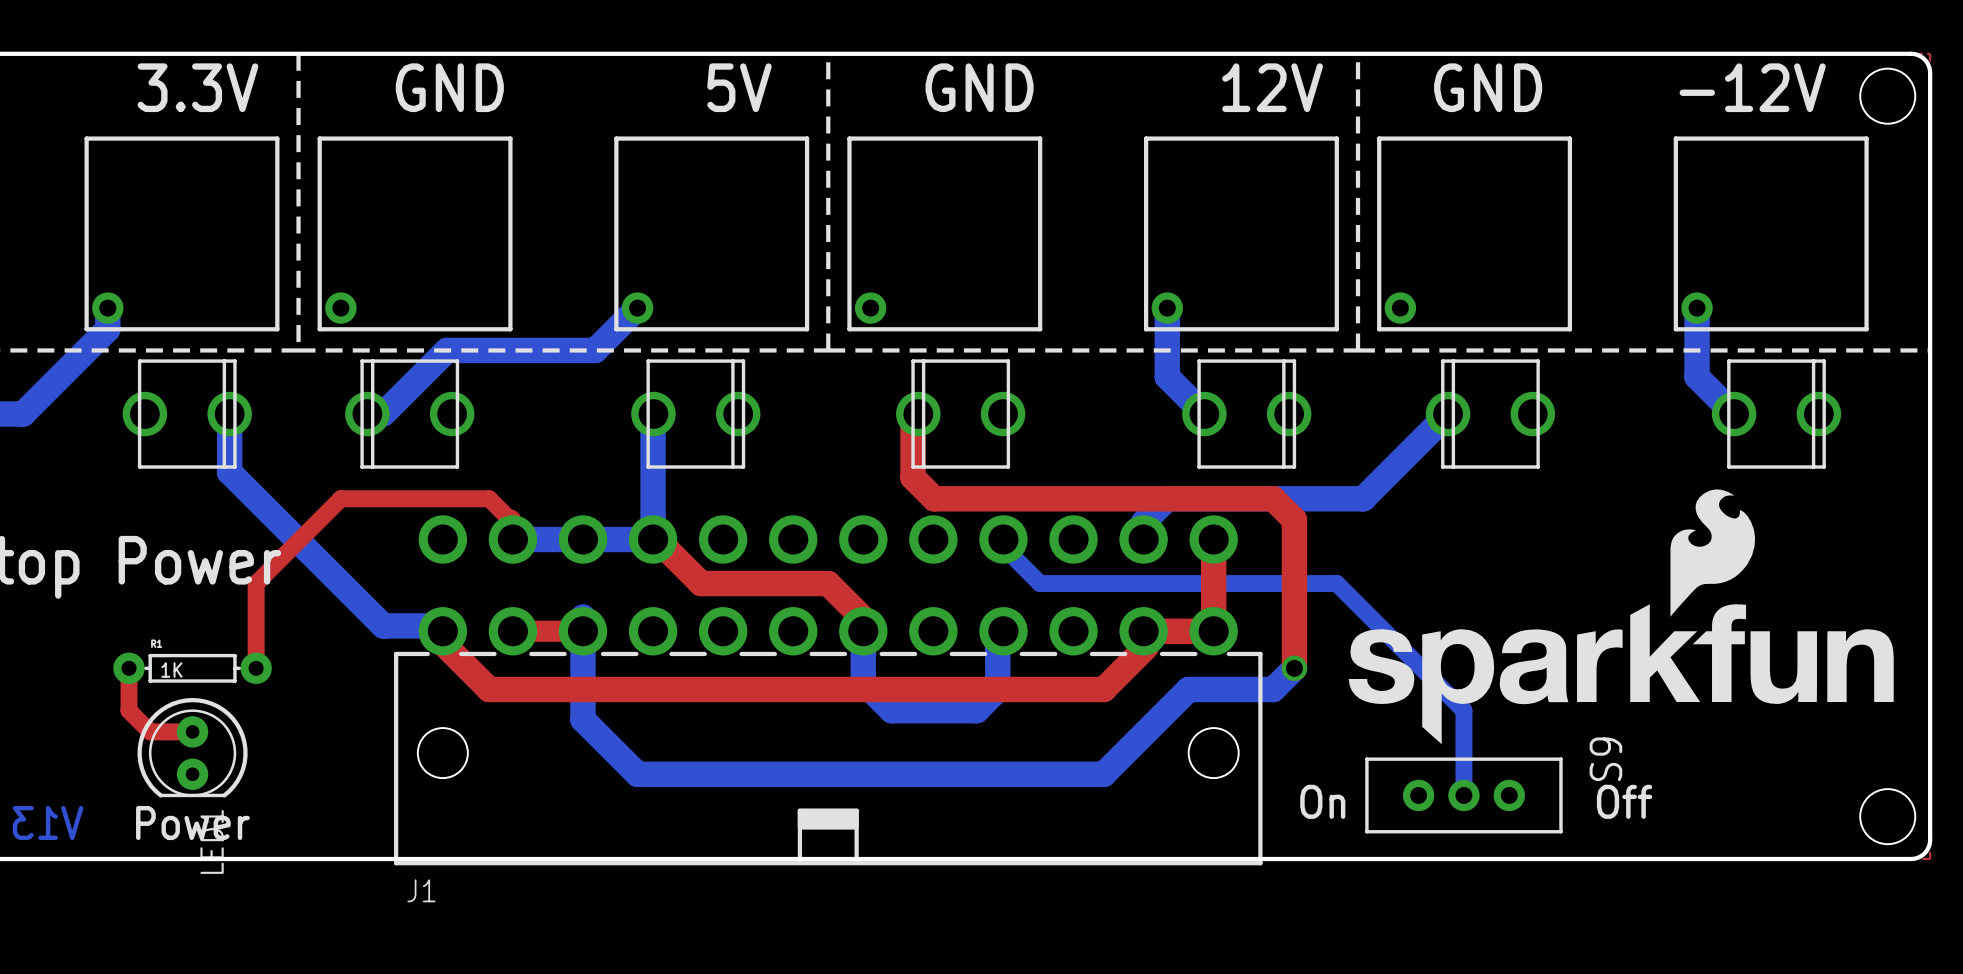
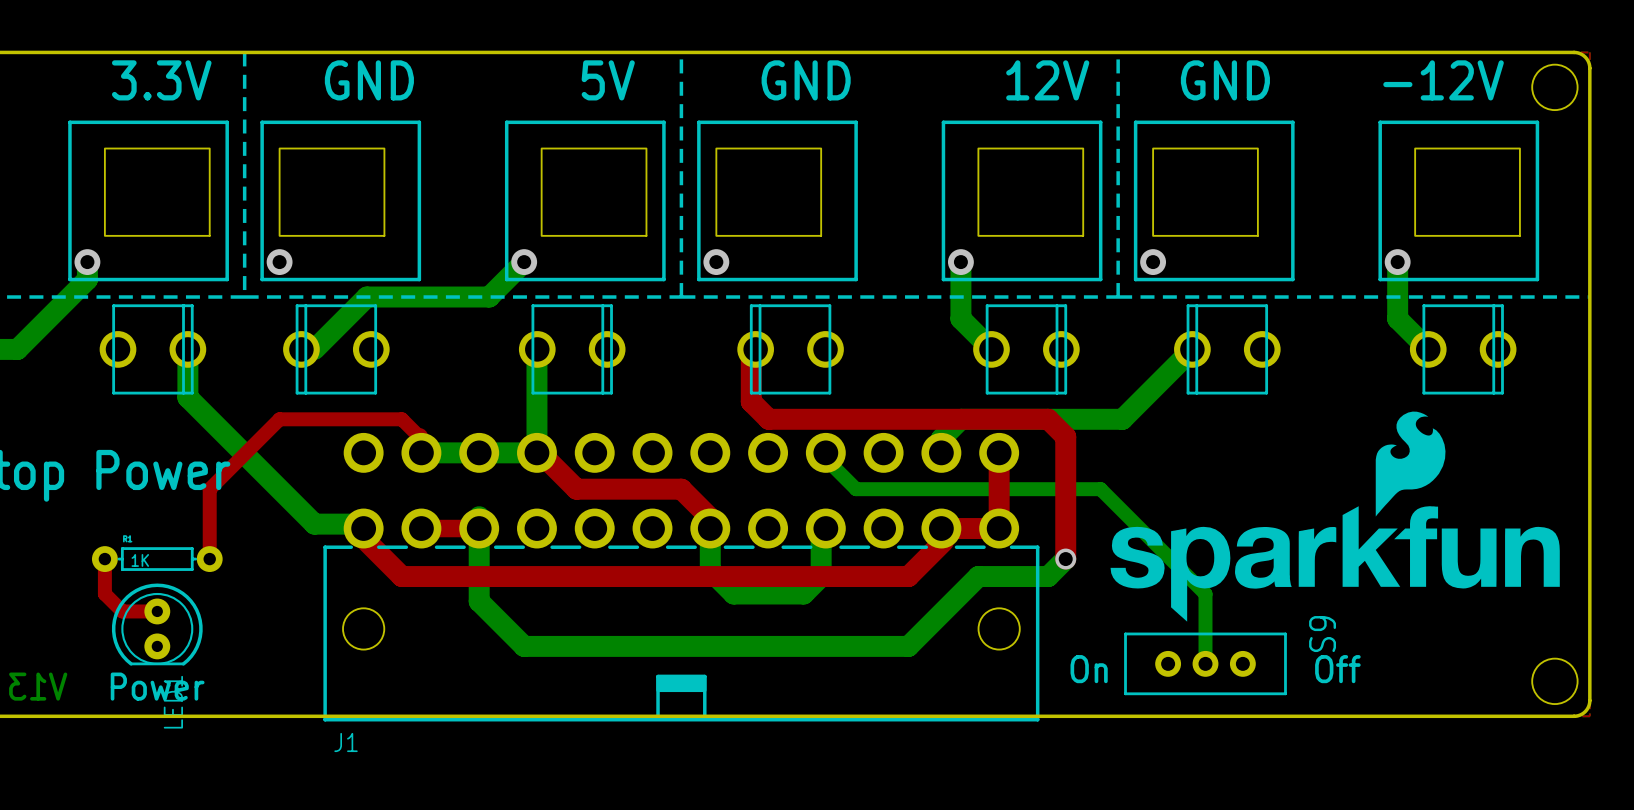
drawing: none -> [104, 148, 210, 236]
drawing: none -> [279, 148, 385, 236]
drawing: none -> [541, 148, 647, 236]
drawing: none -> [716, 148, 822, 236]
drawing: none -> [978, 148, 1084, 236]
drawing: none -> [1153, 148, 1258, 236]
drawing: none -> [1415, 148, 1520, 236]

